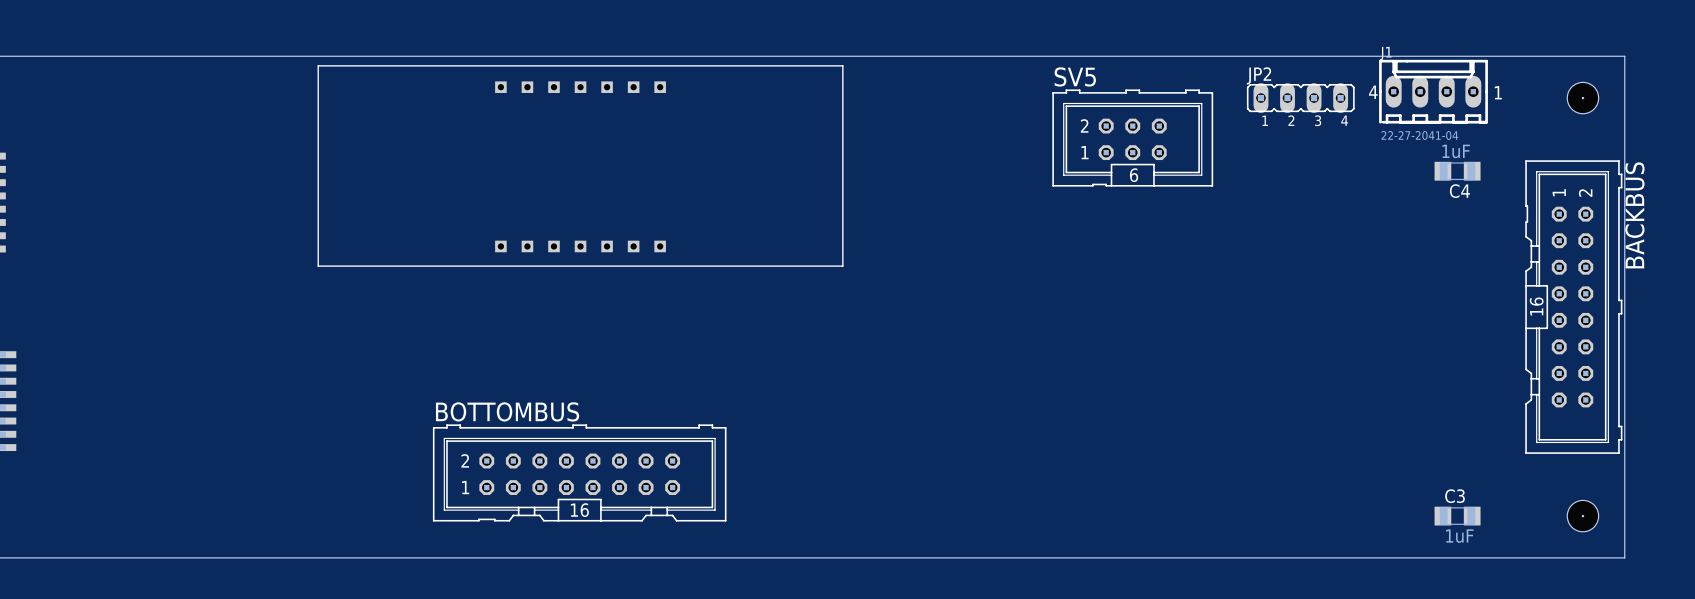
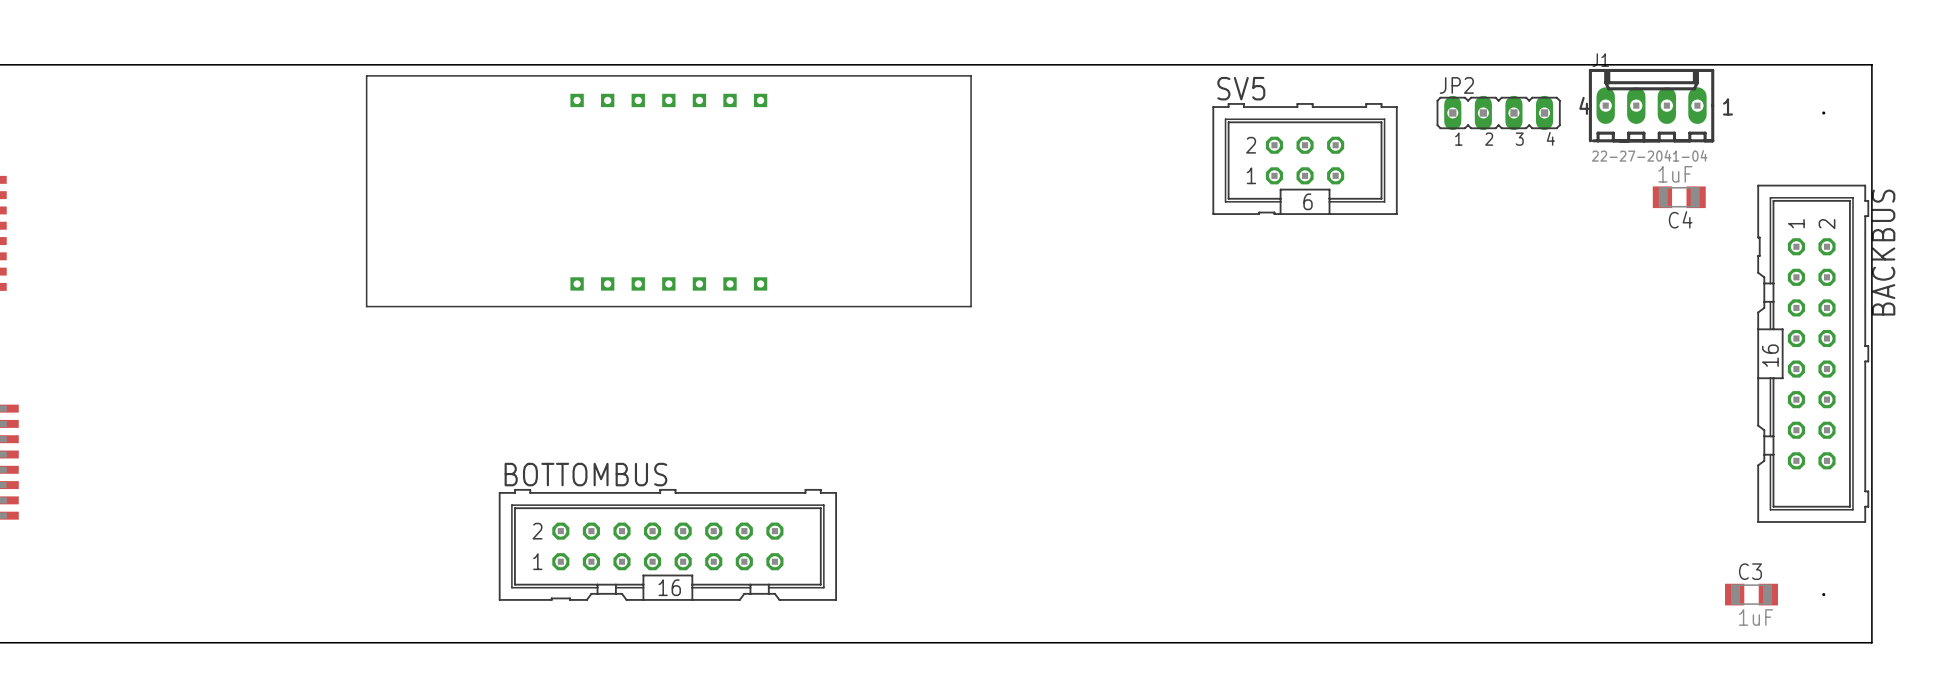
hole: (1582, 98) -> none
C3 position: (1457, 516) -> (1751, 594)
hole: (1582, 516) -> none

